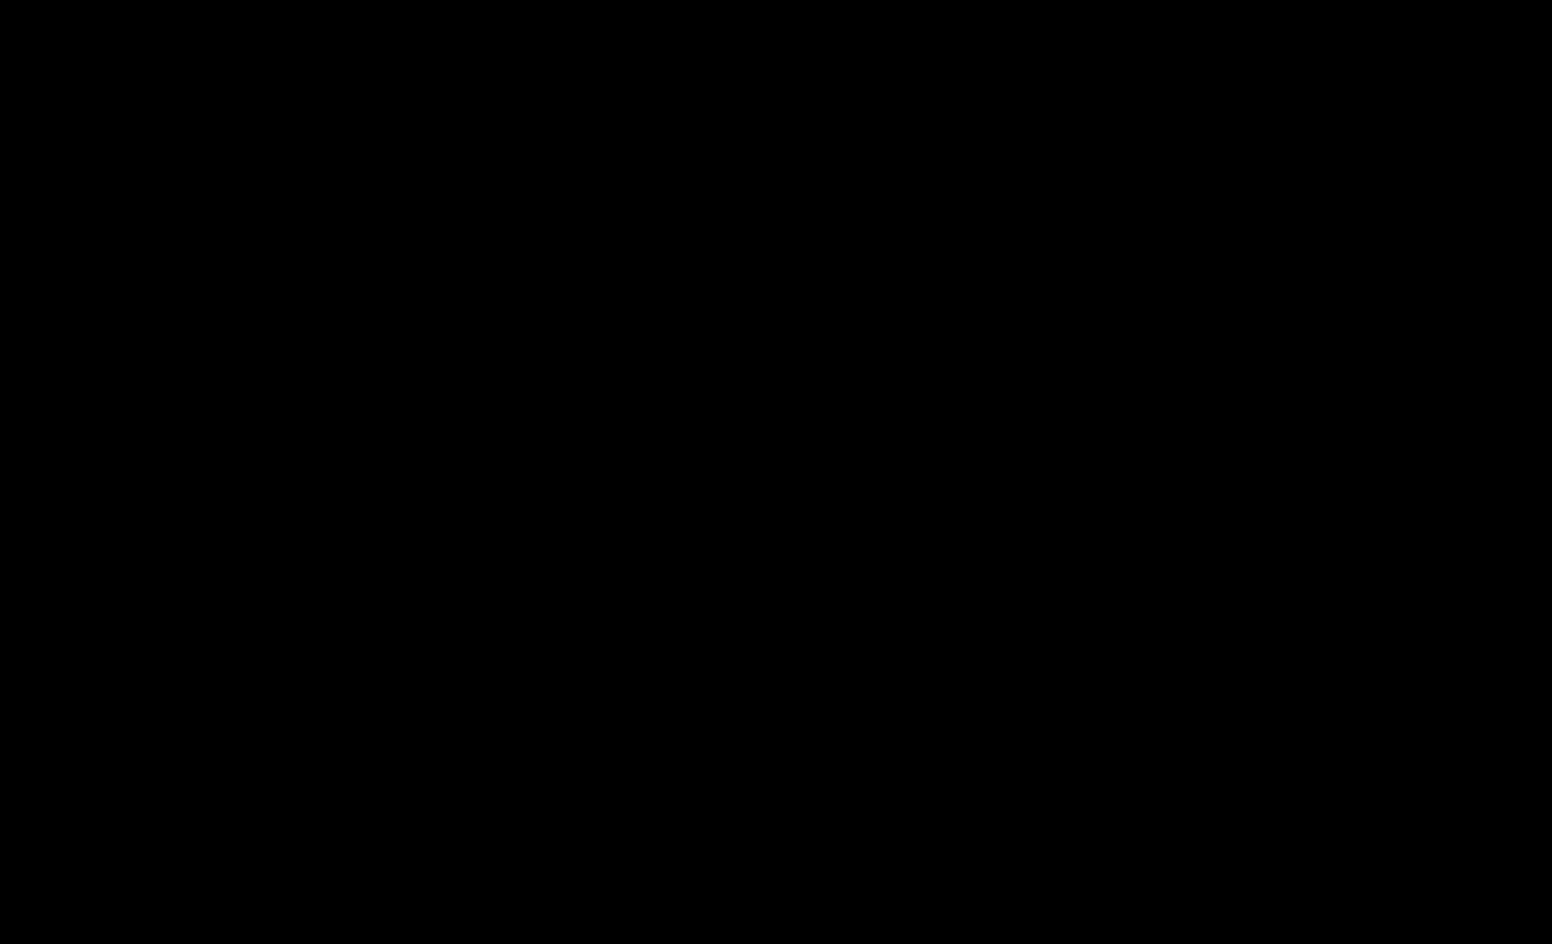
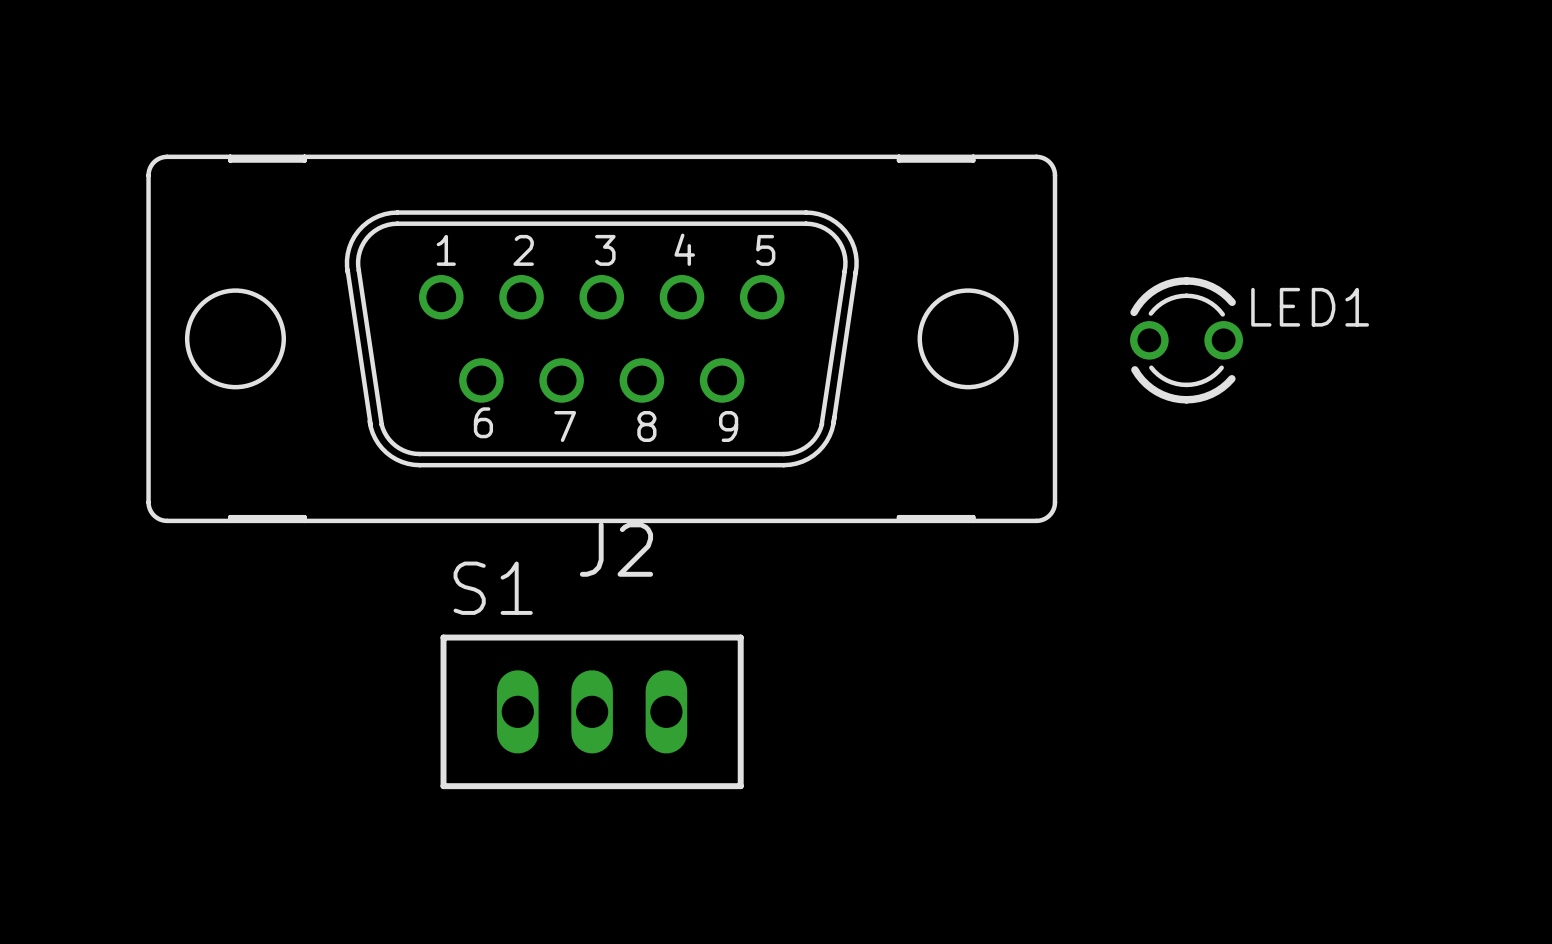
J2: none -> (601, 338)
LED1: none -> (1186, 340)
S1: none -> (592, 711)

